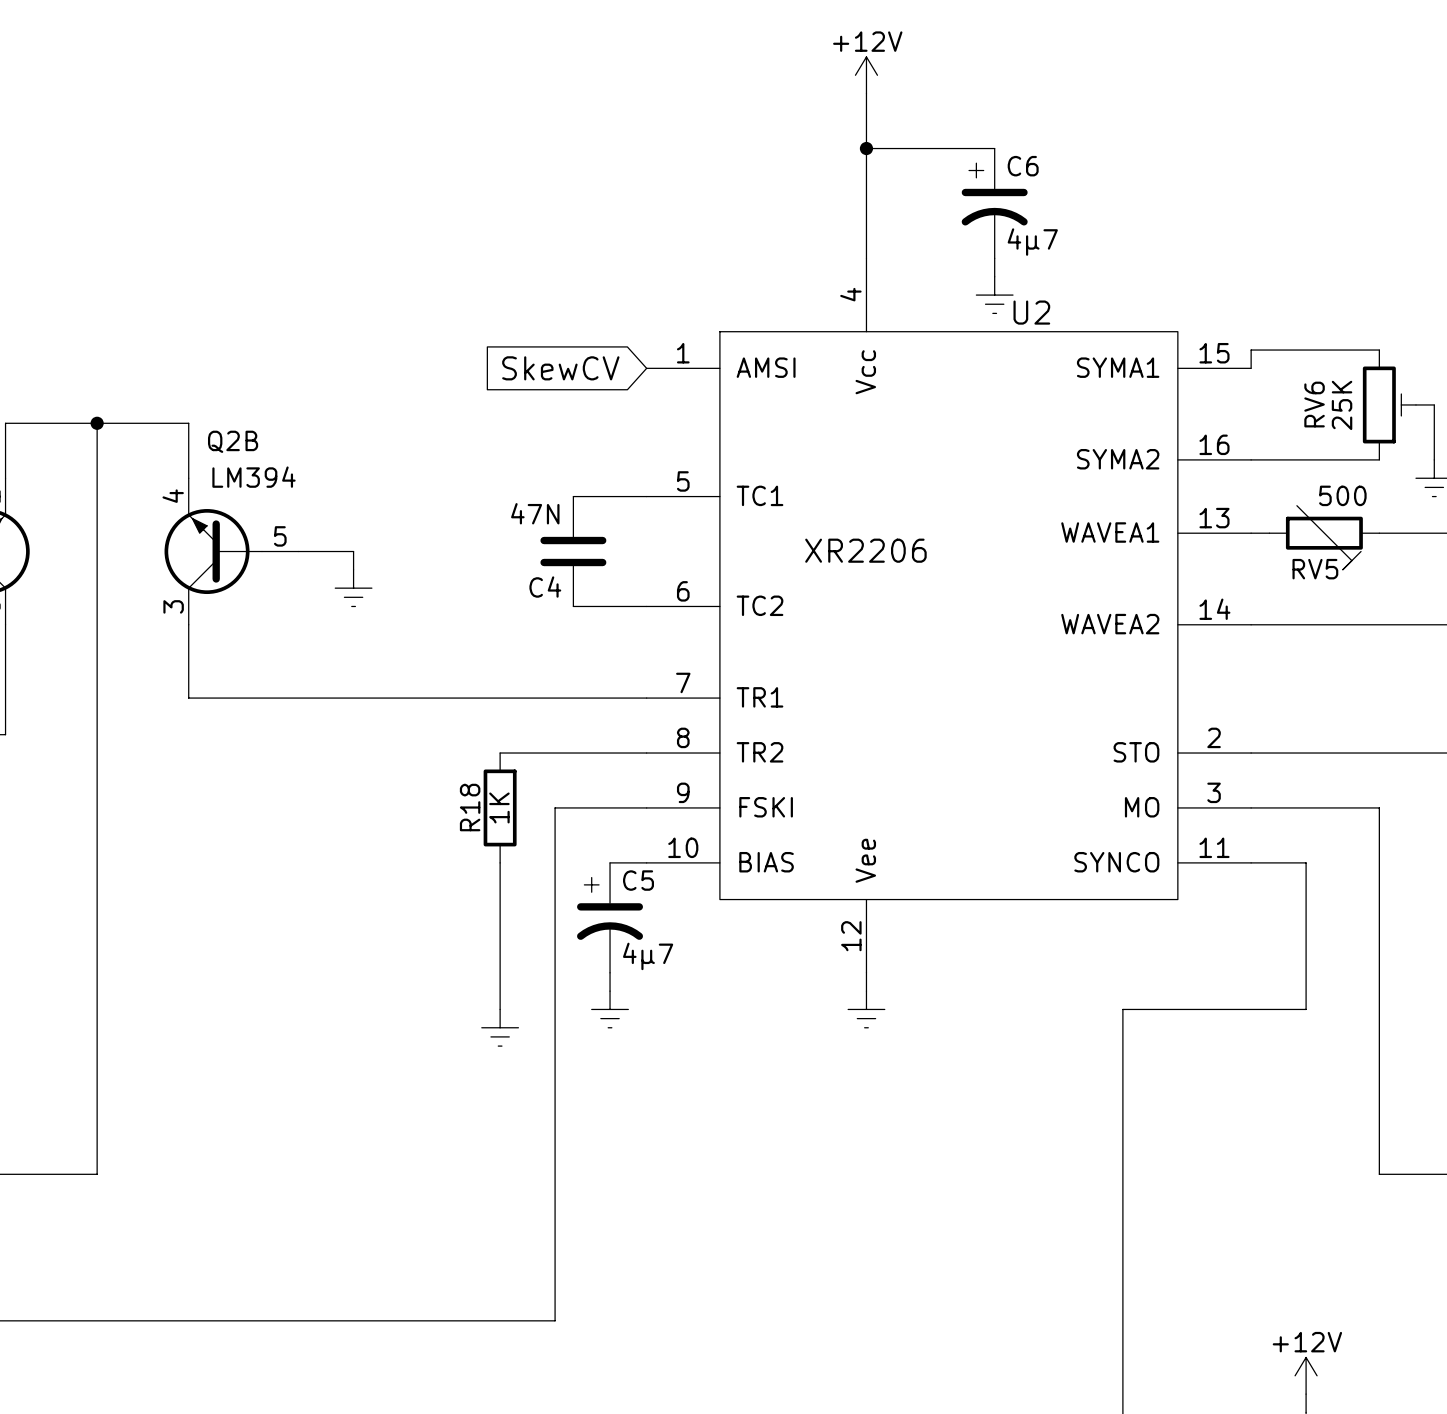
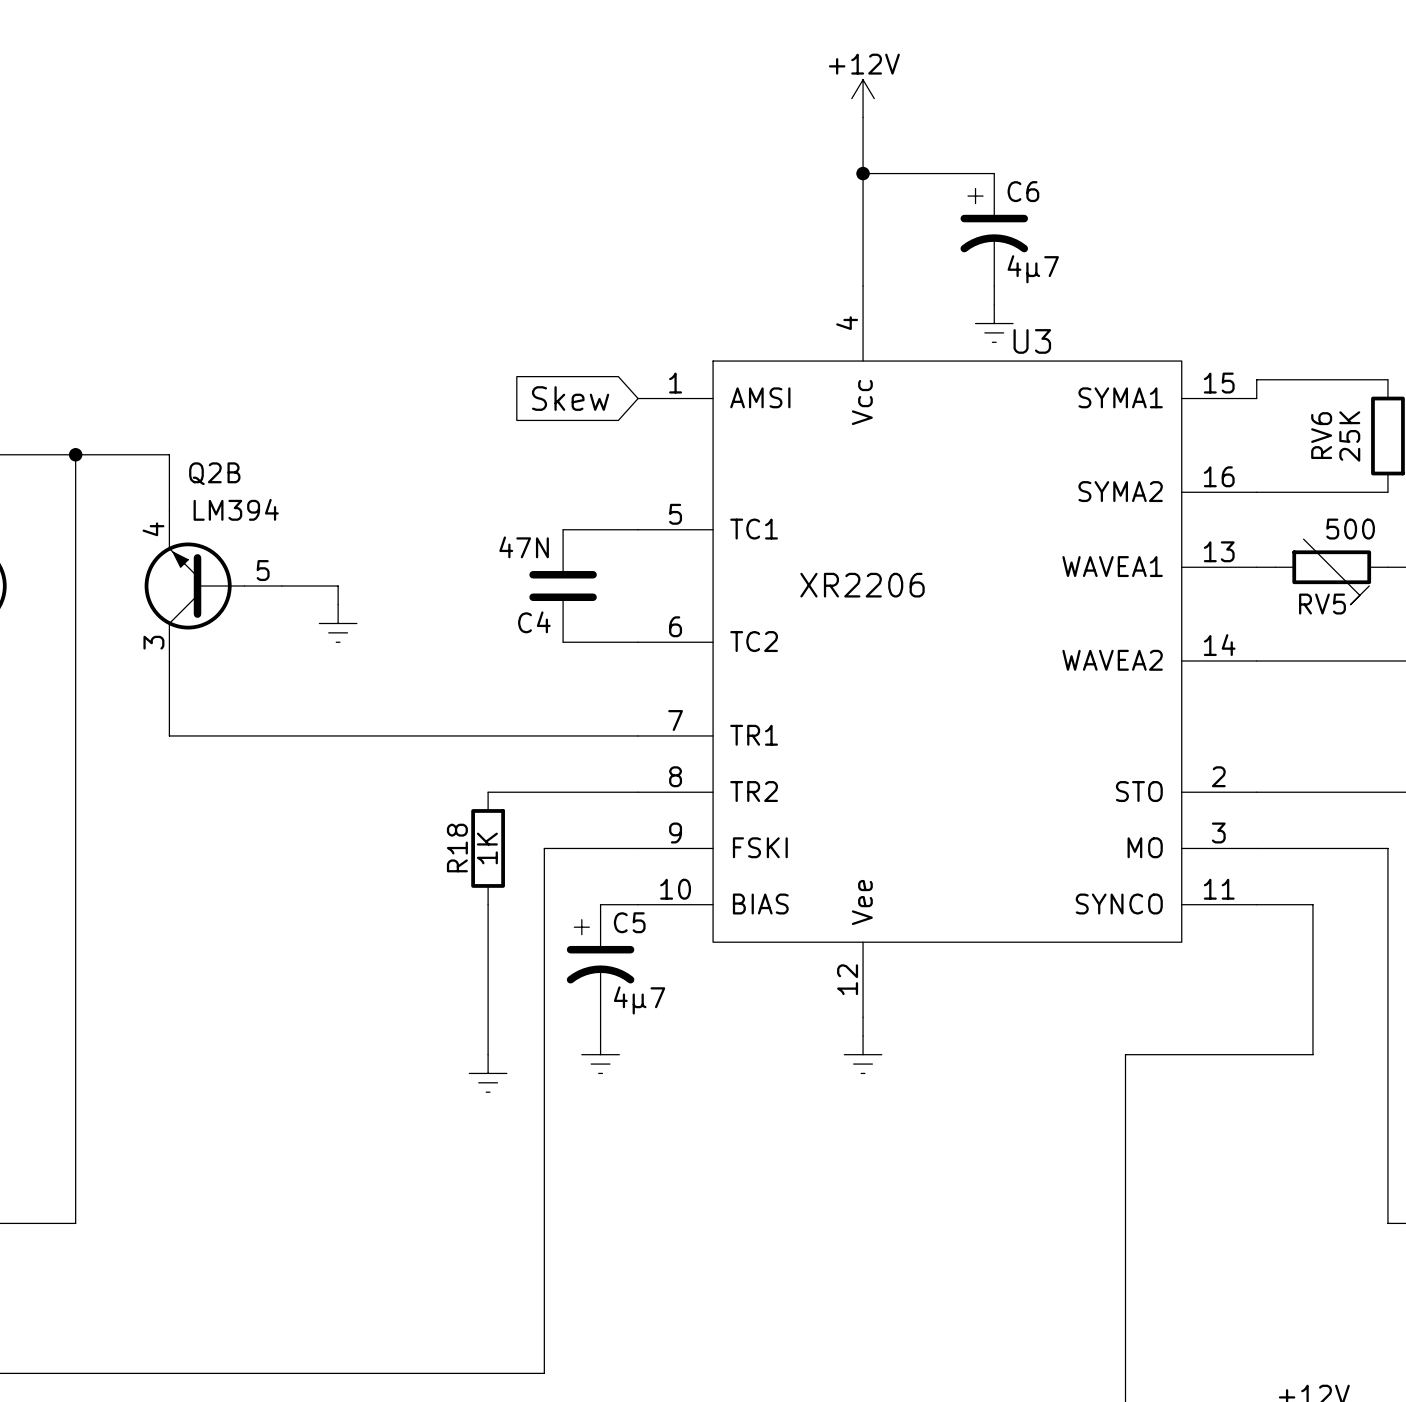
U2 name: U2 (1031, 312) -> U3 (1032, 341)
global label: SkewCV (560, 368) -> Skew (570, 398)

